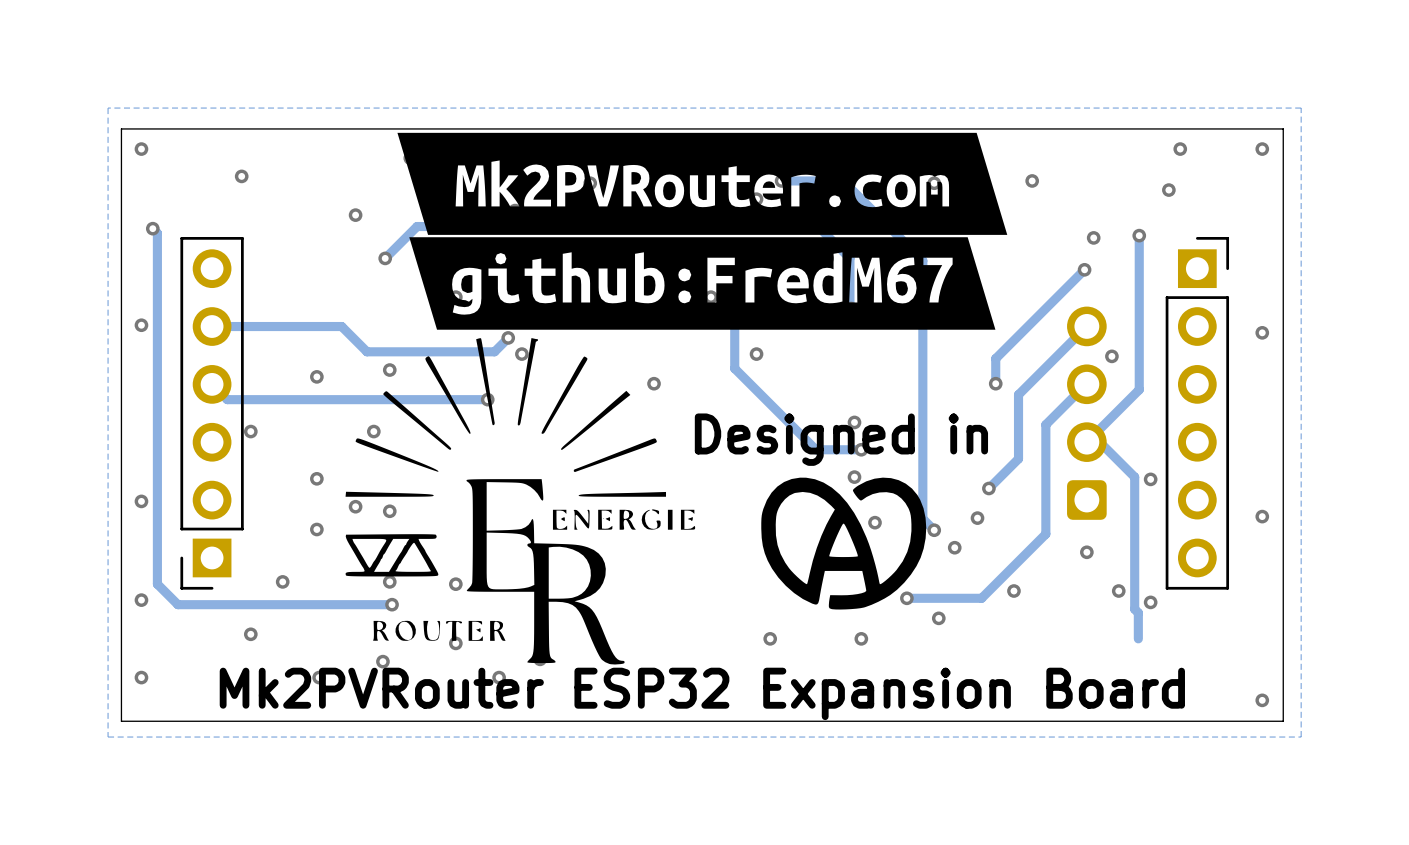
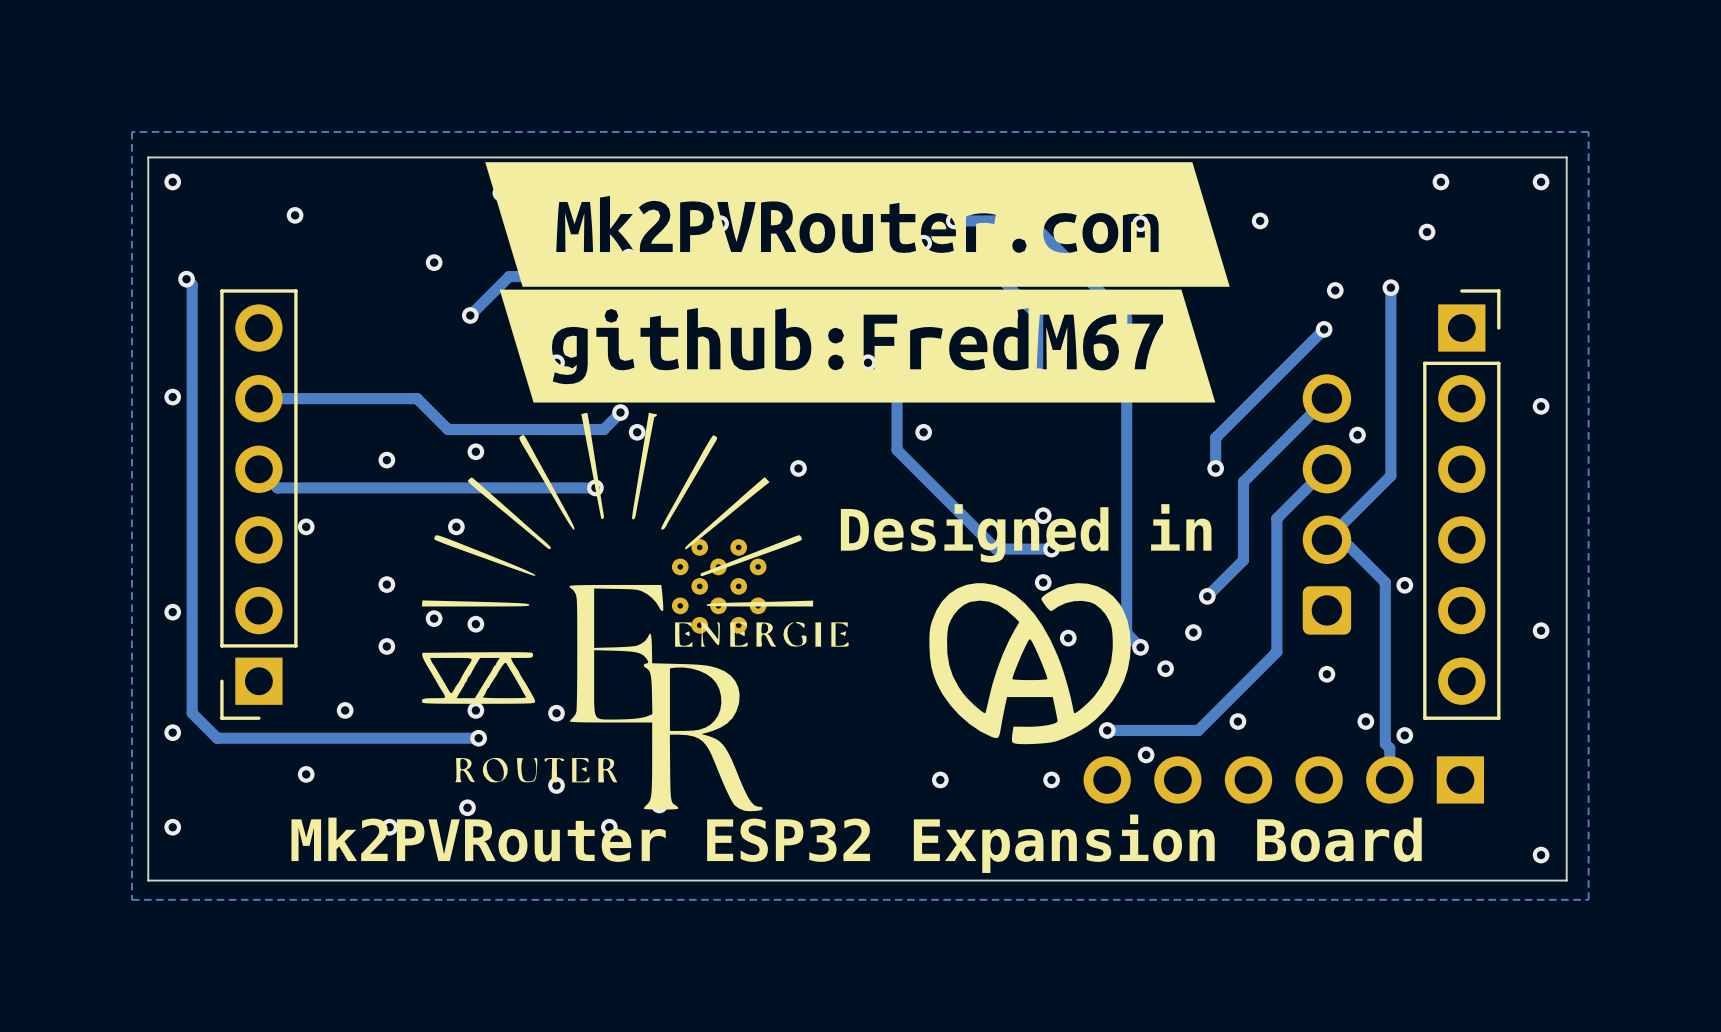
part: none -> (719, 586)
part: none -> (1283, 779)

